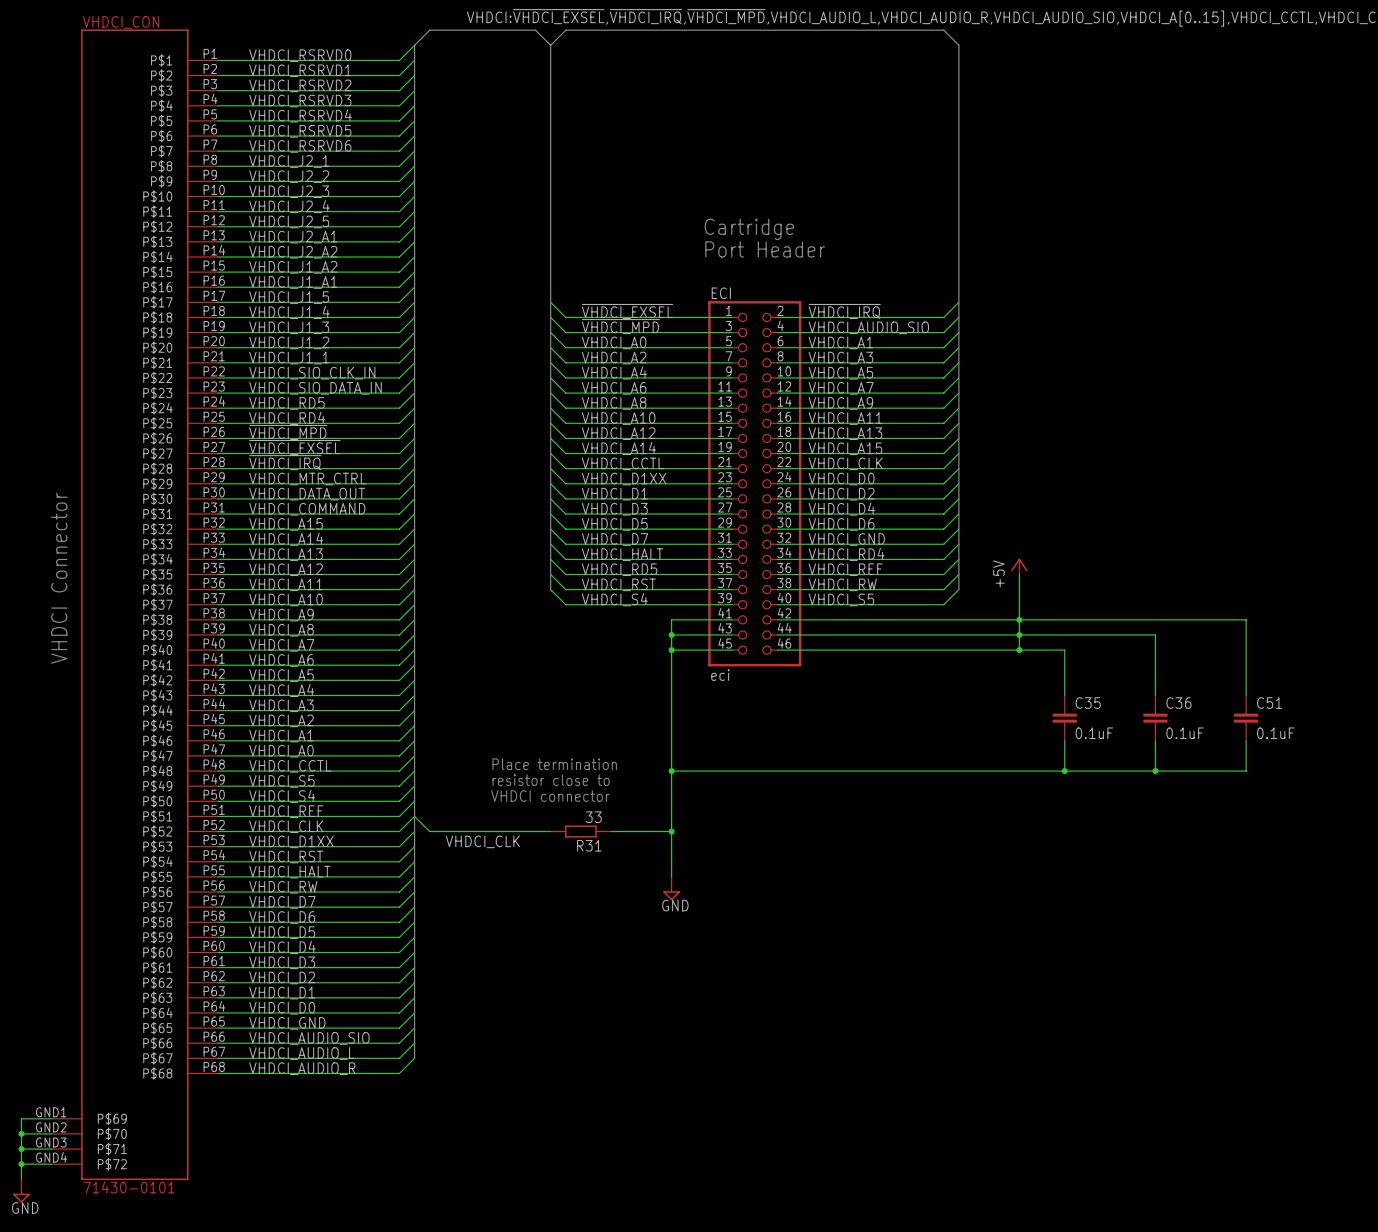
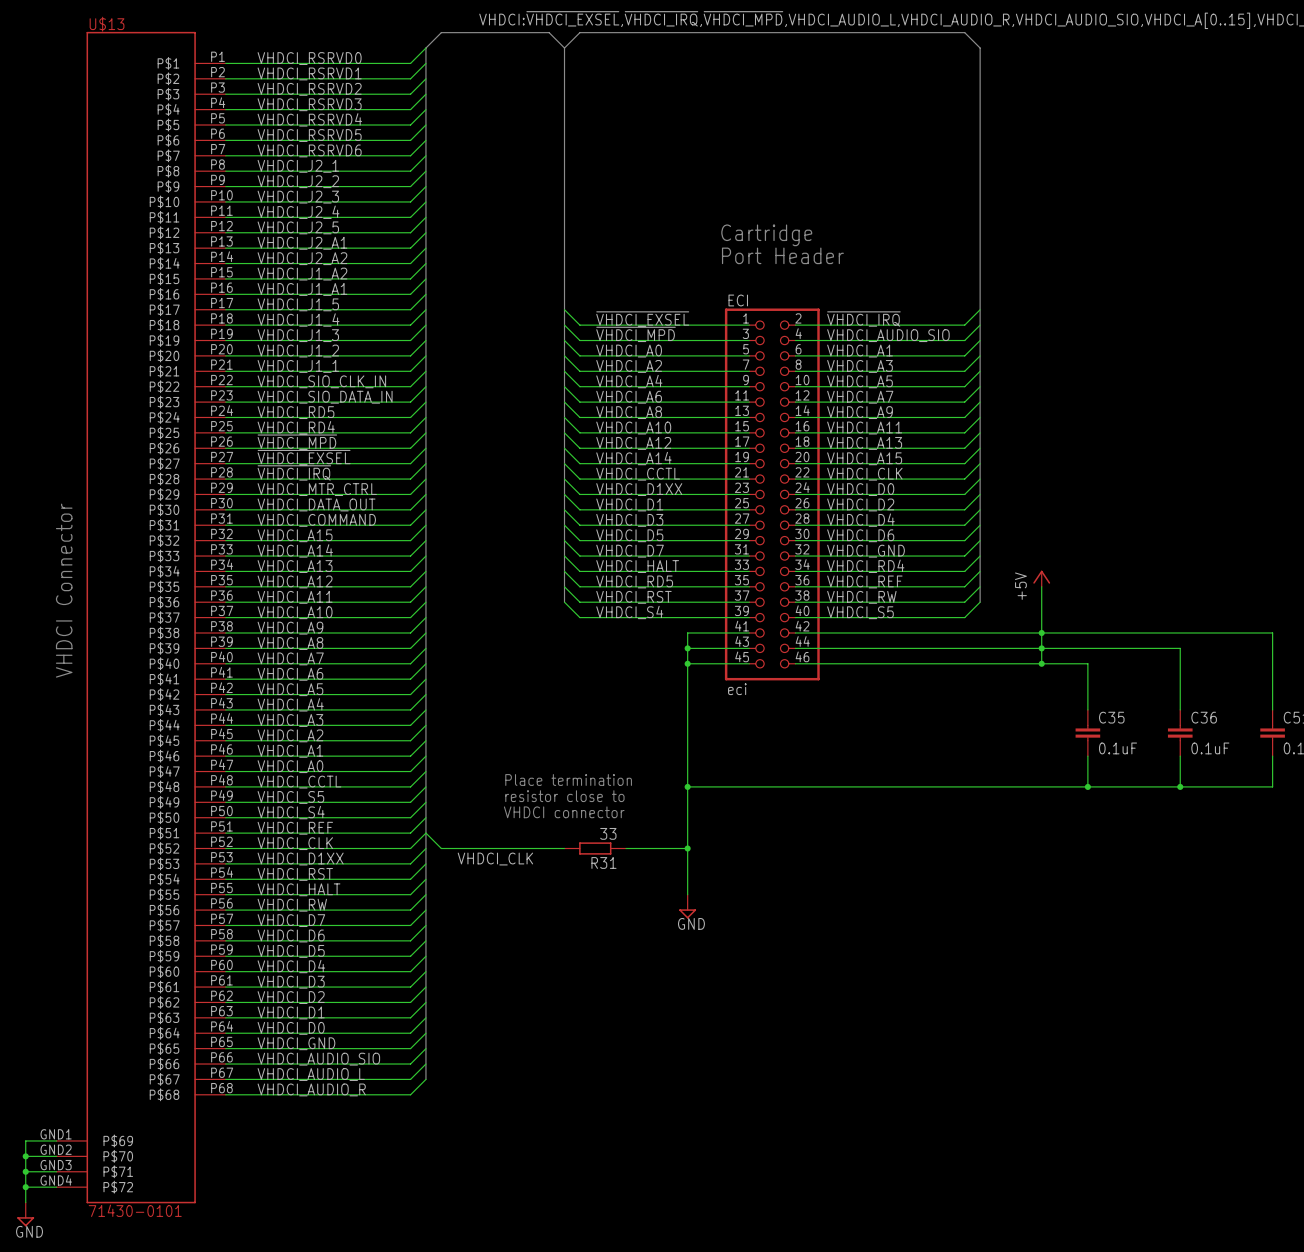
VHDCI_CON name: VHDCI_CON (121, 22) -> U$13 (107, 24)

